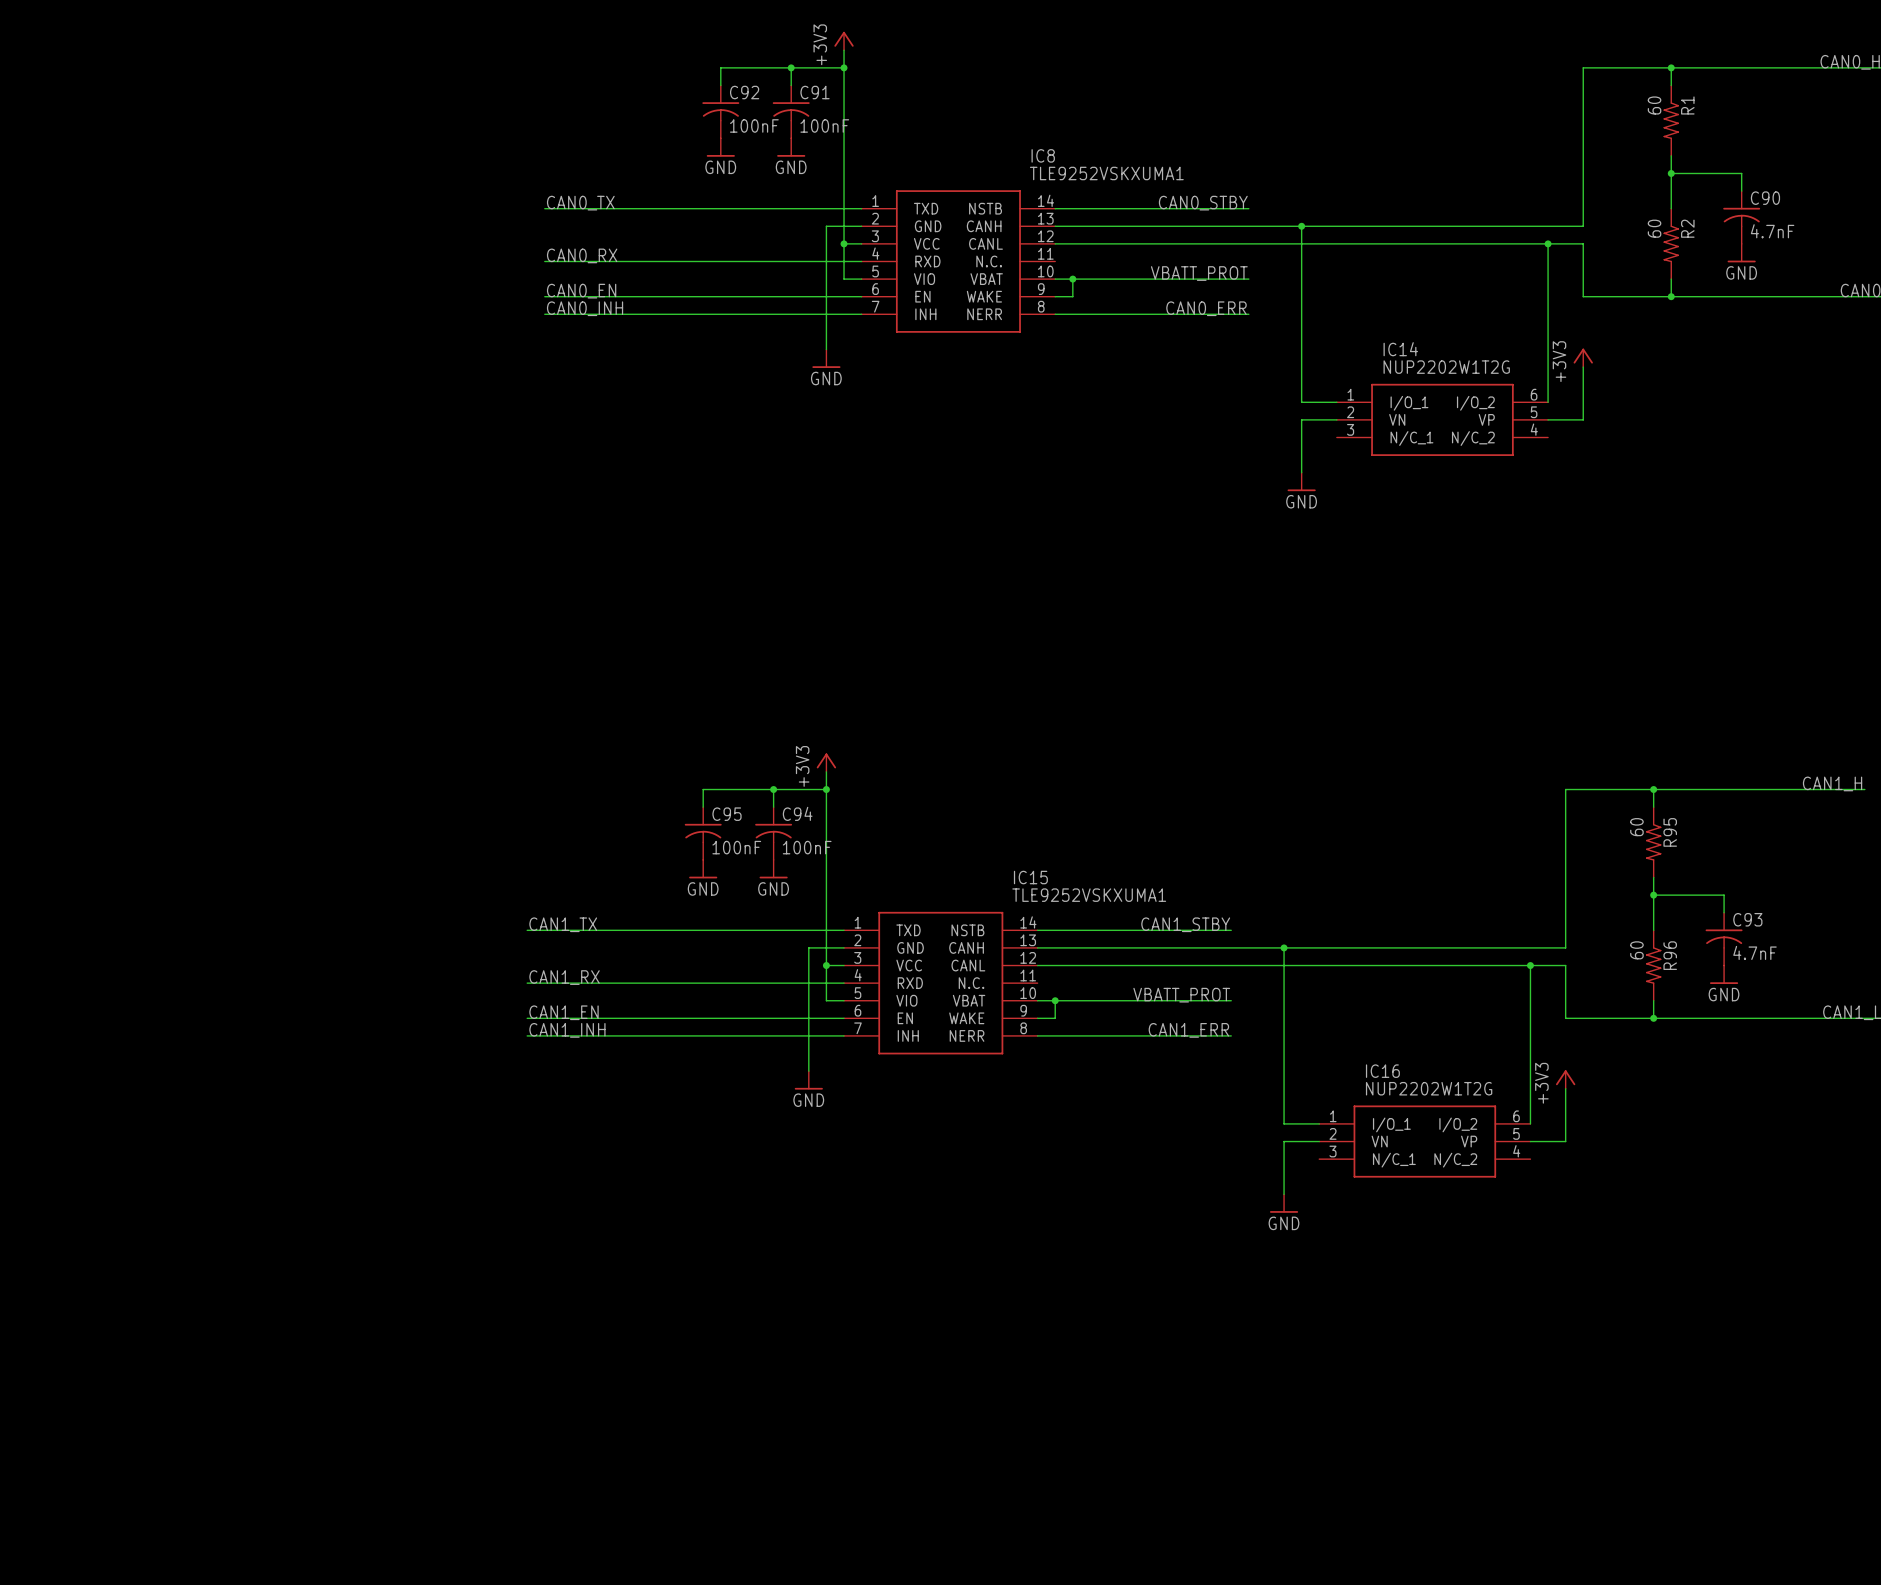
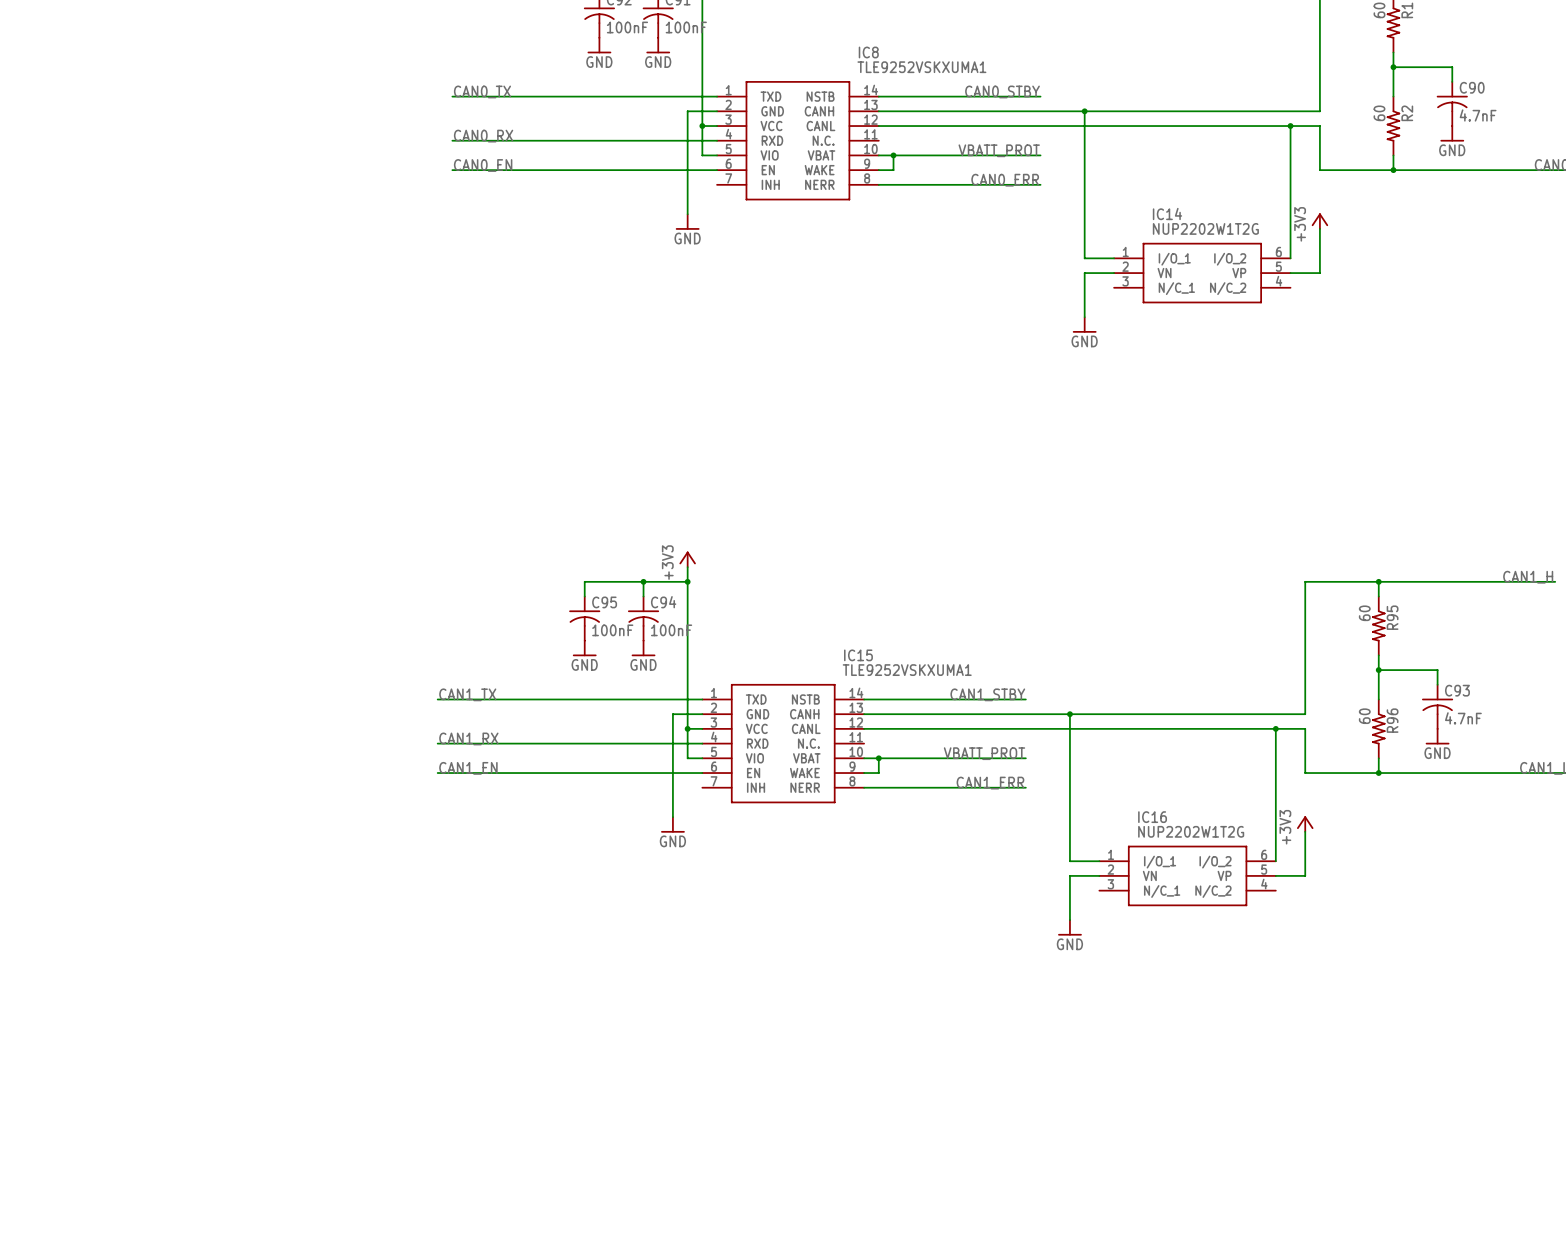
label: CAN0_INH (585, 308) -> none
wire: (544, 314) (861, 314) -> none
label: CAN1_INH (567, 1030) -> none
wire: (527, 1035) (844, 1035) -> none

